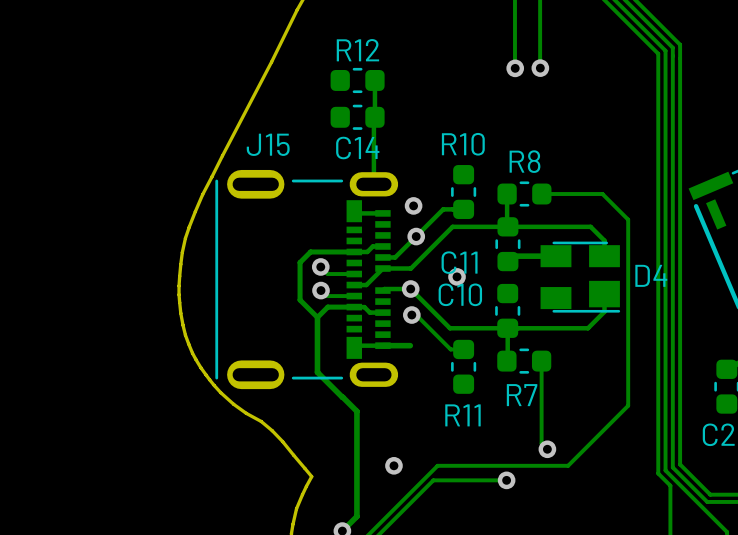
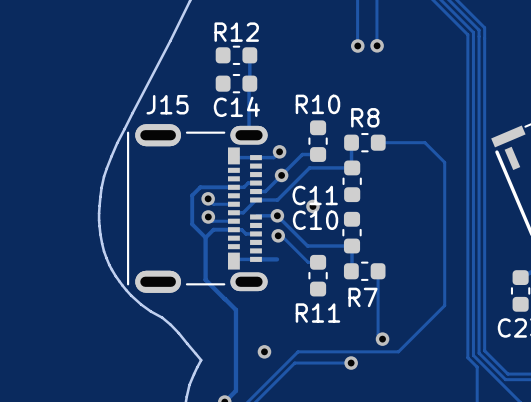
J15 footprint: [215, 169, 399, 390] -> [127, 124, 268, 293]
track: none -> (279, 151) (273, 157) (255, 157)
track: (507, 226) (590, 226) (604, 240) (604, 256) -> none
track: (555, 256) (513, 256) -> none
D4: (580, 277) -> none
track: (604, 294) (604, 311) (588, 328) (507, 328) -> none

